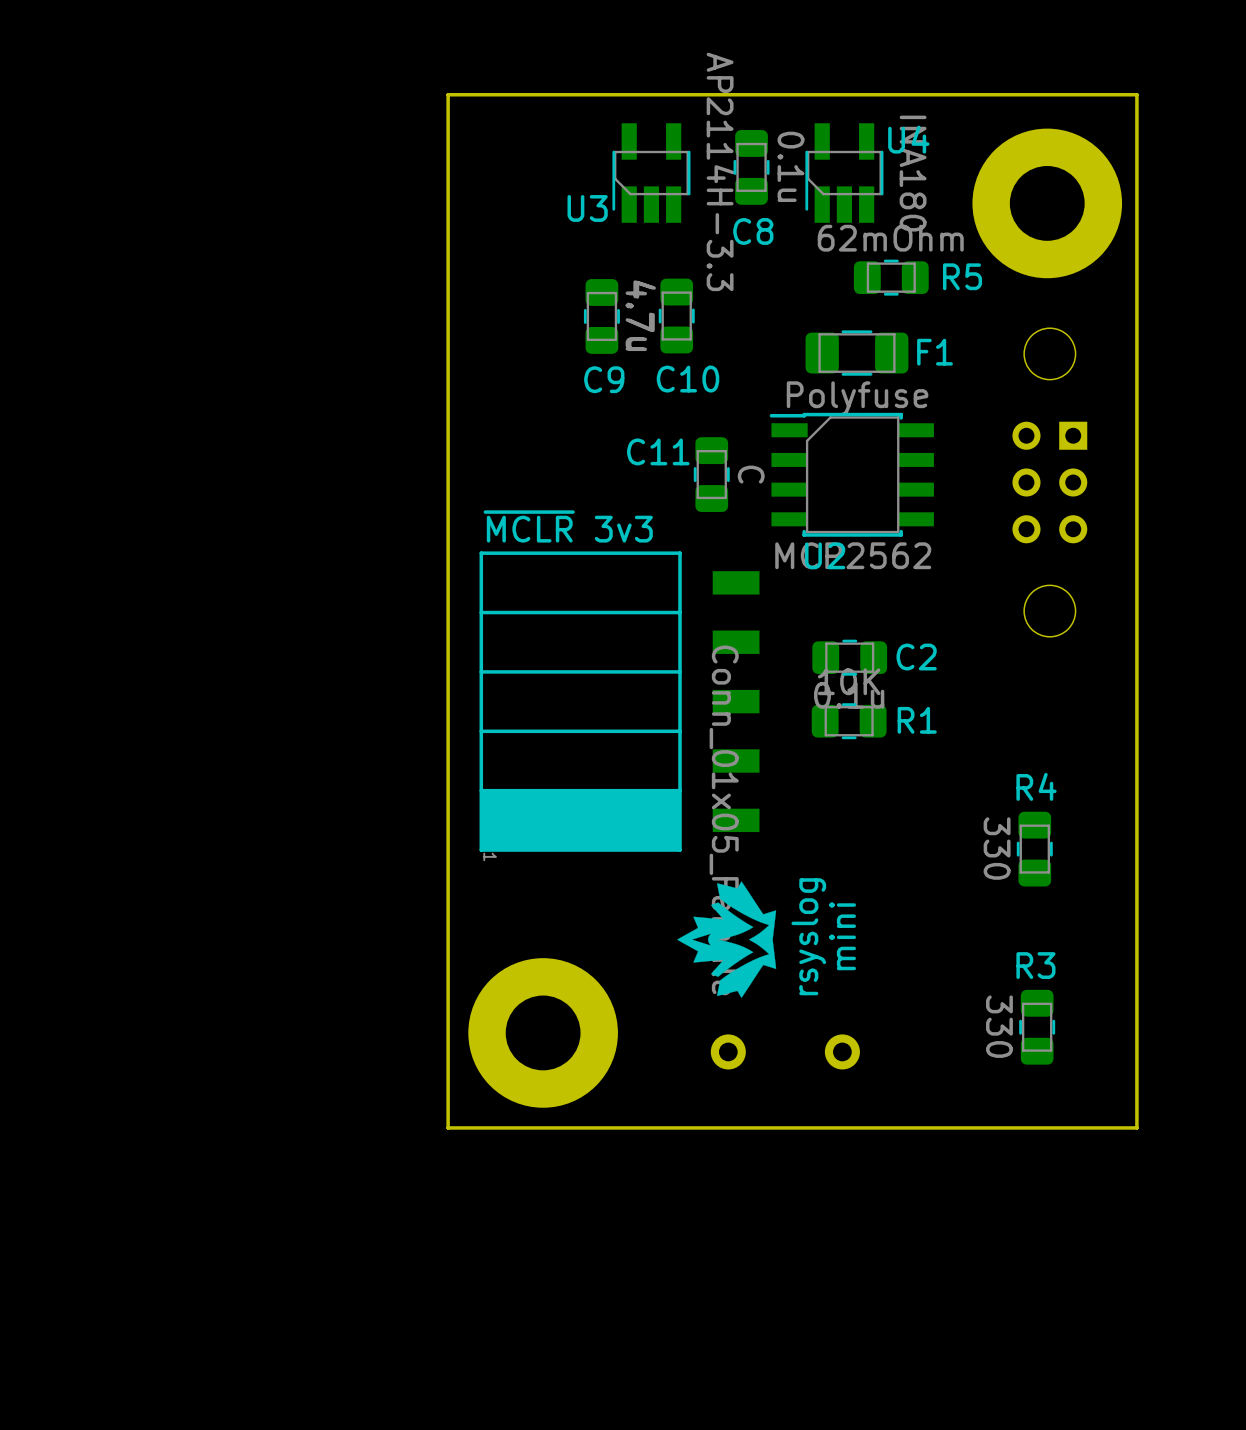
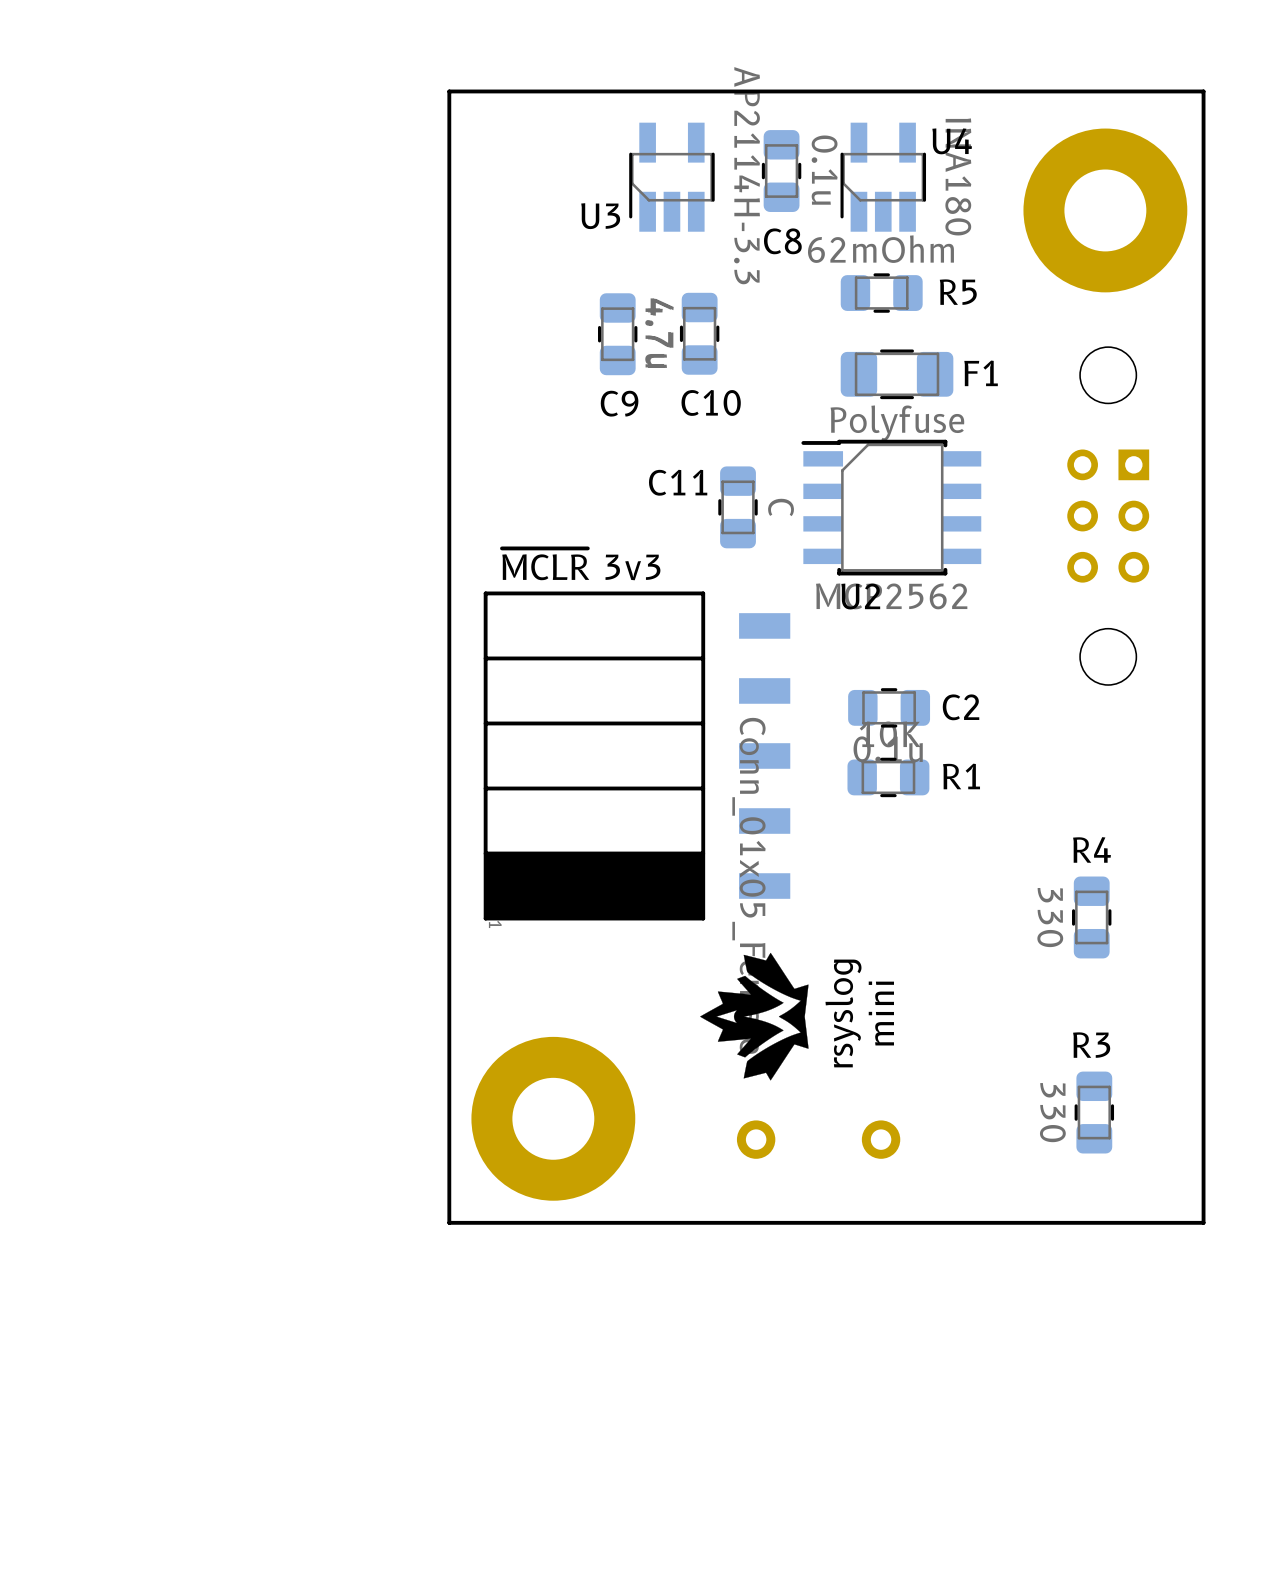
R5 position: (891, 277) -> (881, 293)

